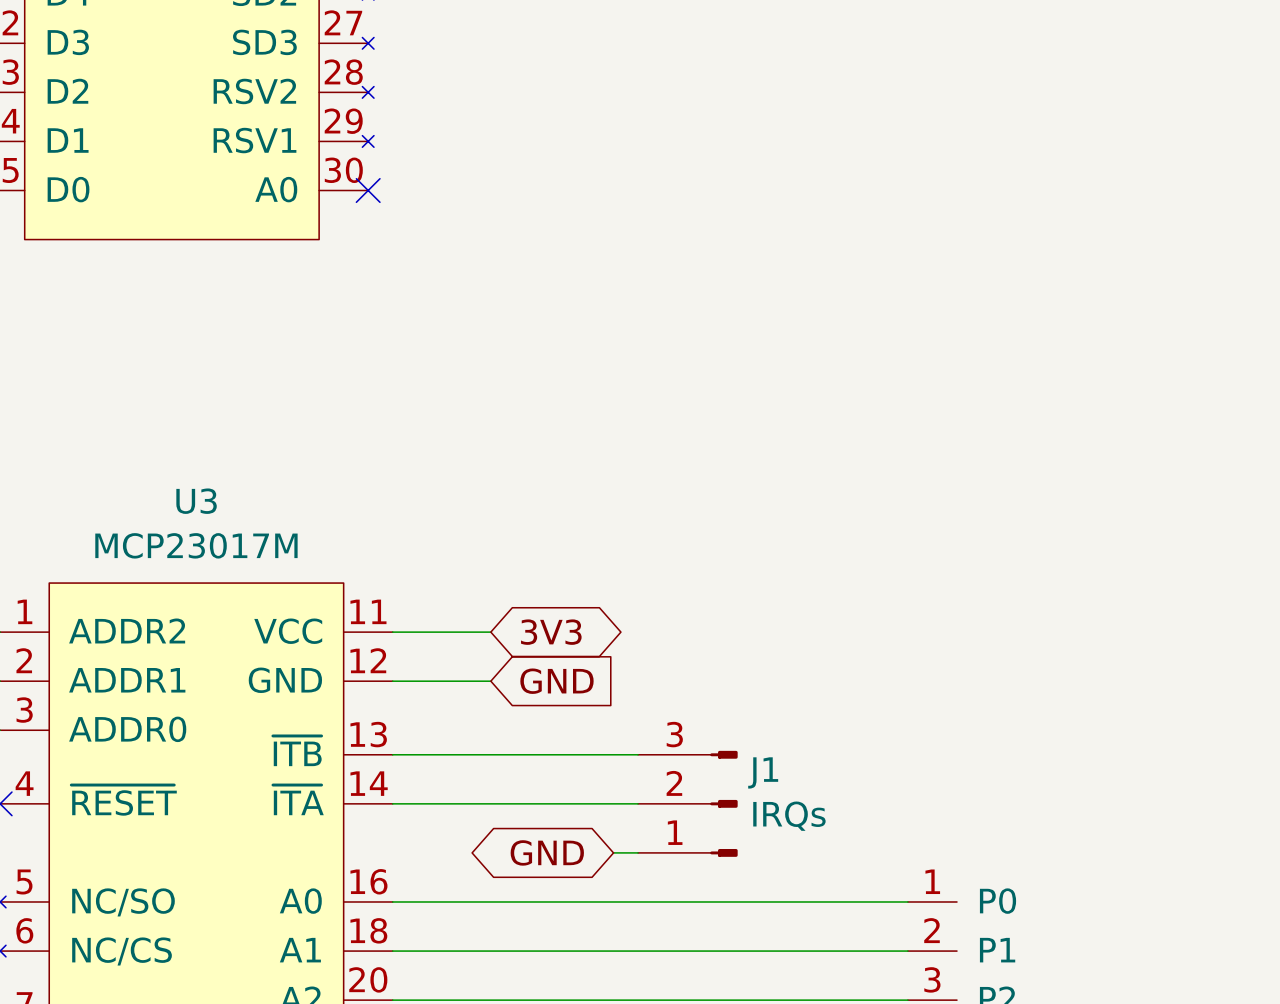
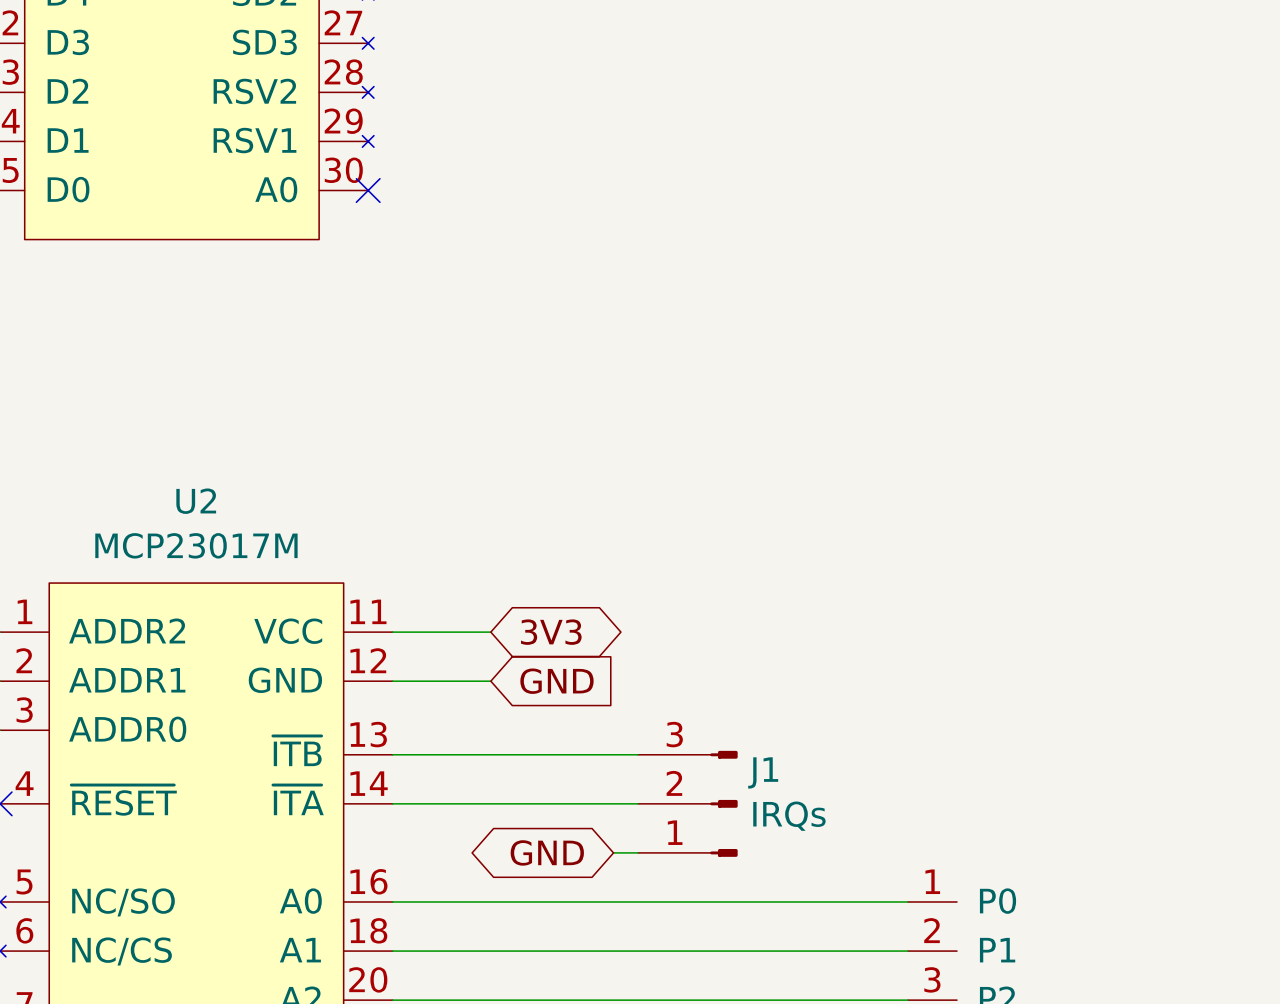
U3 name: U3 (196, 501) -> U2 (196, 501)

